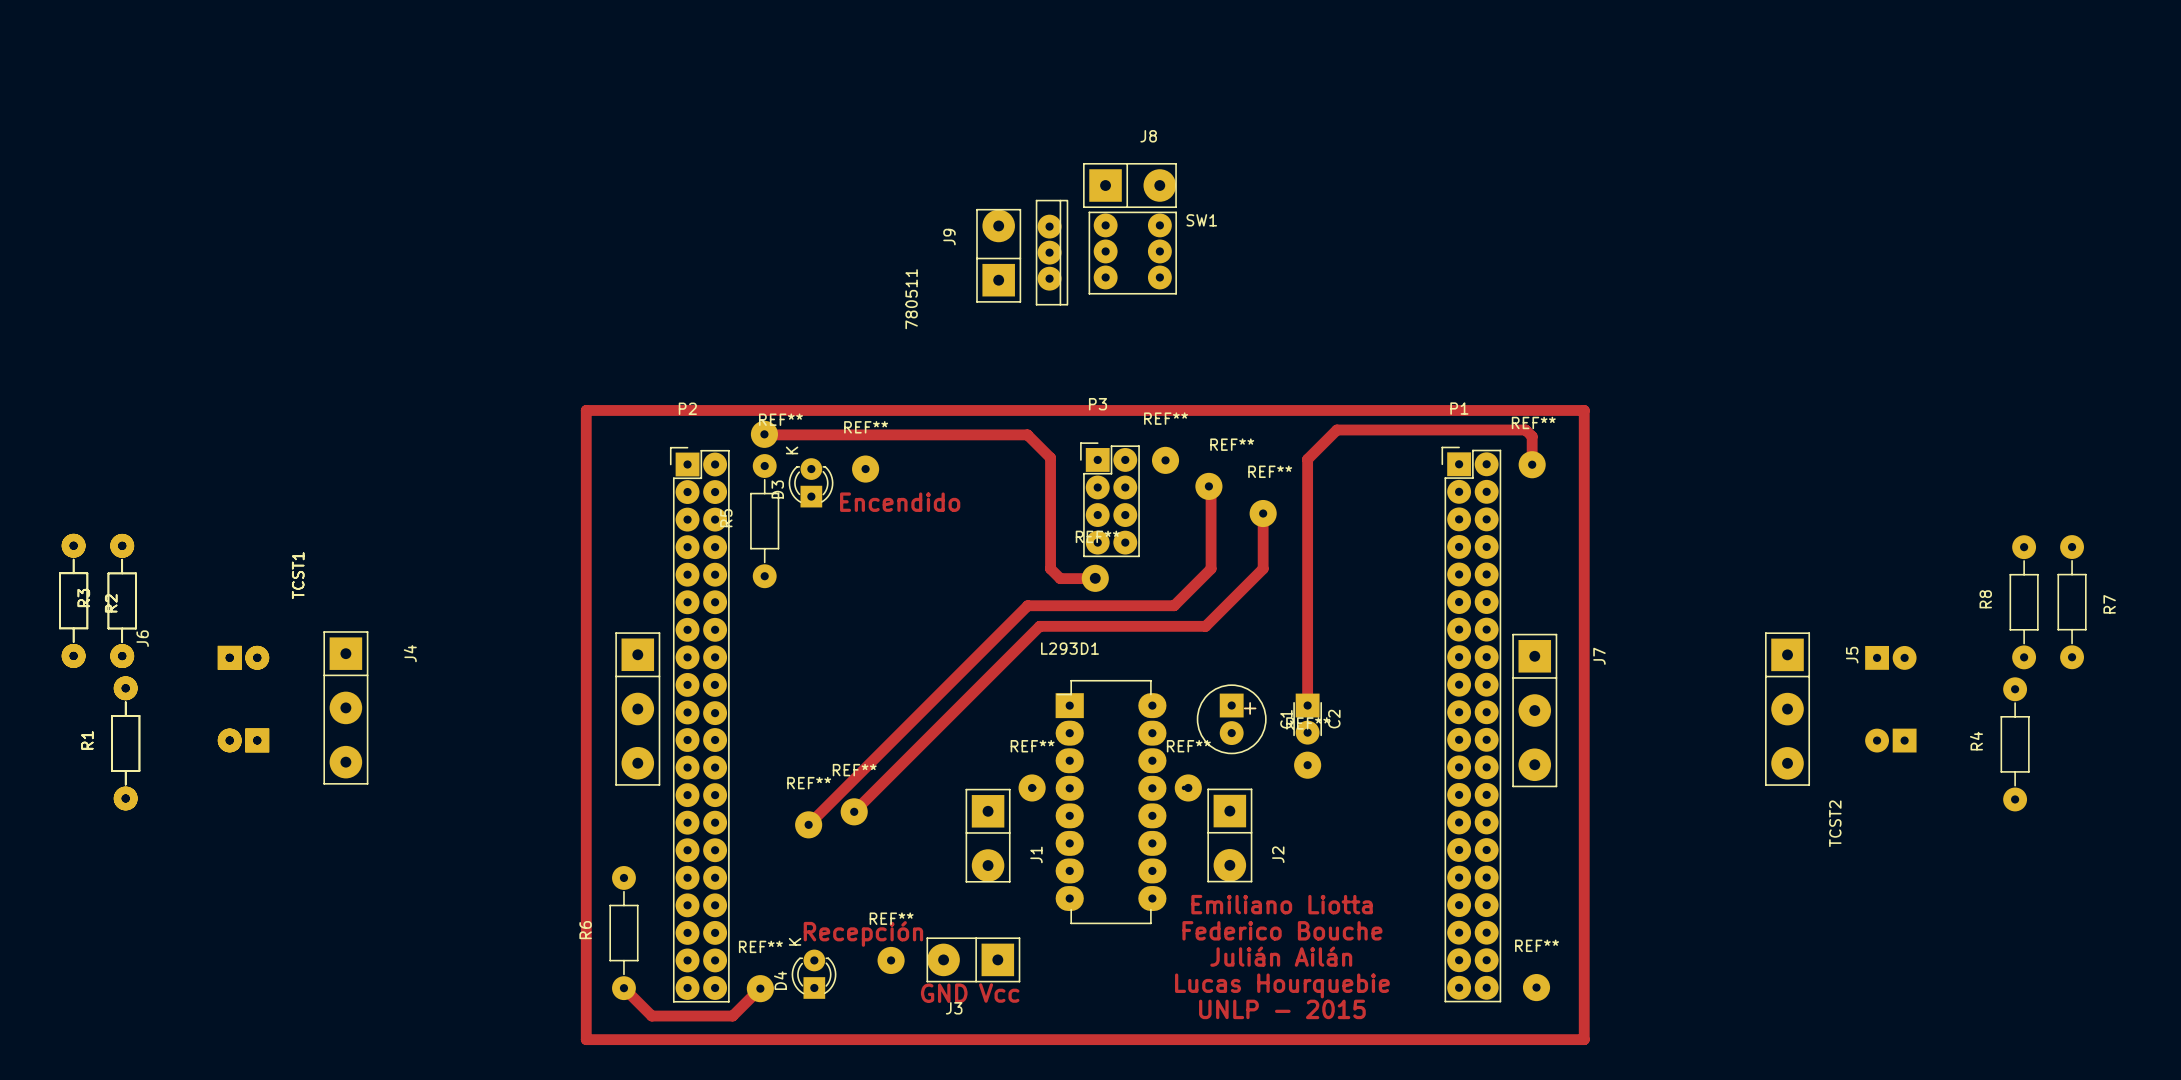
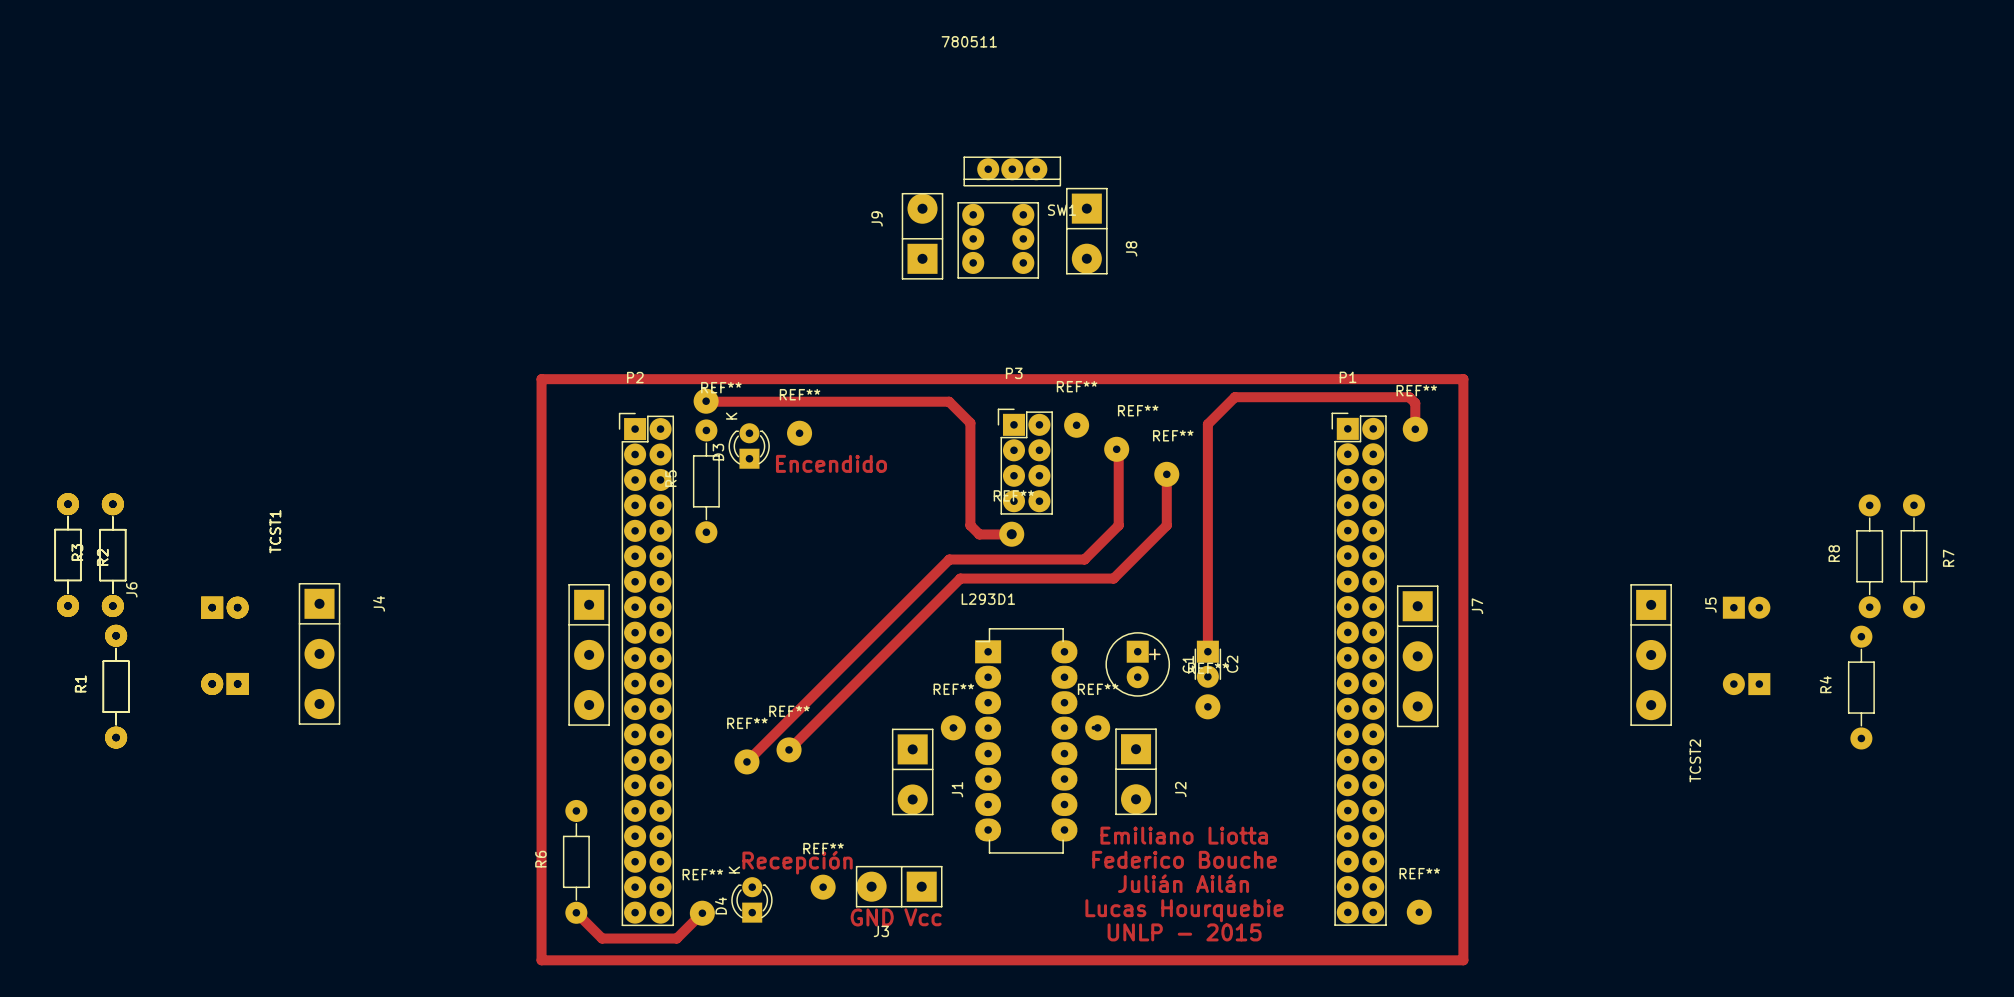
J8 rotation: 0° (1129, 185) -> 90° clockwise (1086, 231)
J8 position: (1129, 185) -> (1086, 231)
780511 rotation: 0° (1052, 252) -> 90° clockwise (1012, 171)
780511 position: (1052, 252) -> (1012, 171)
SW1 position: (1132, 253) -> (998, 240)

